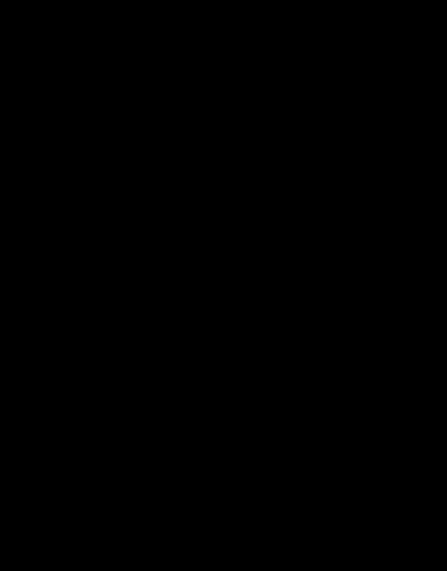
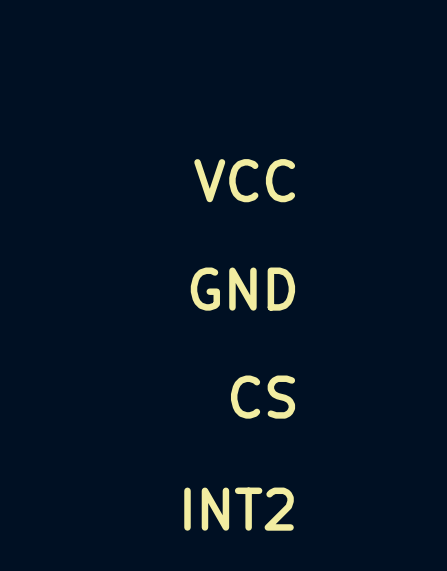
text: none -> VCC (244, 180)
text: none -> GND (242, 289)
text: none -> CS (263, 397)
text: none -> INT2 (239, 509)

